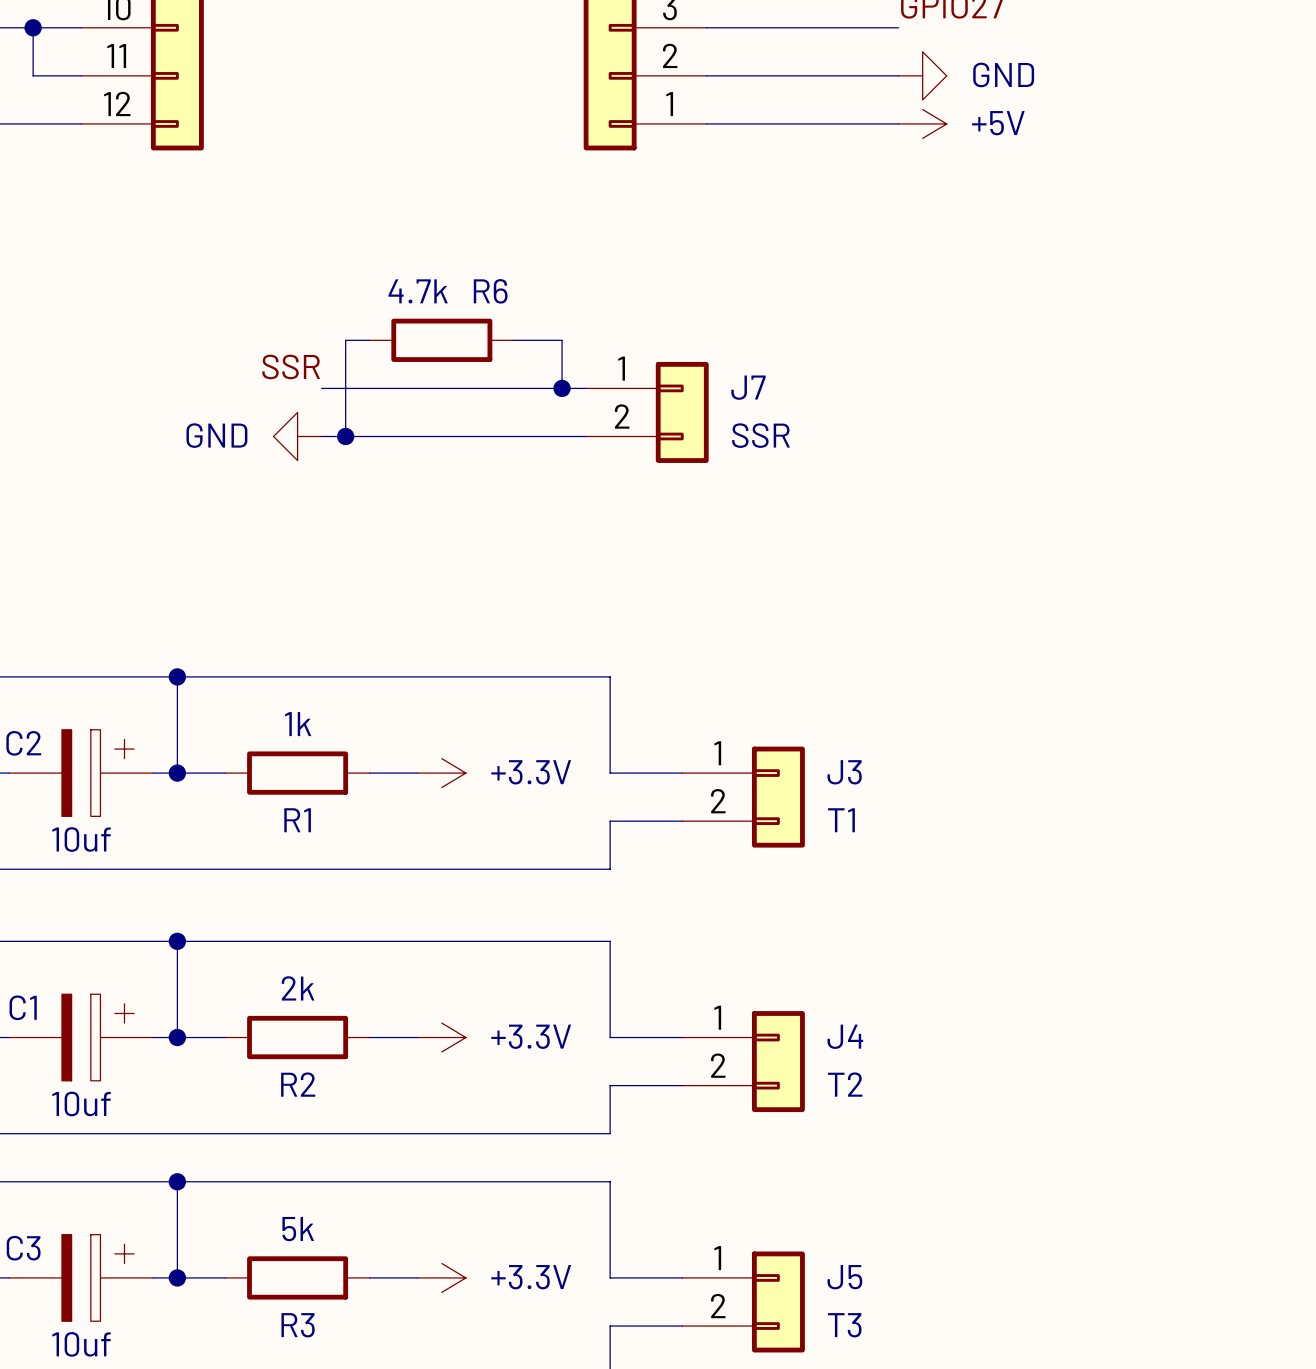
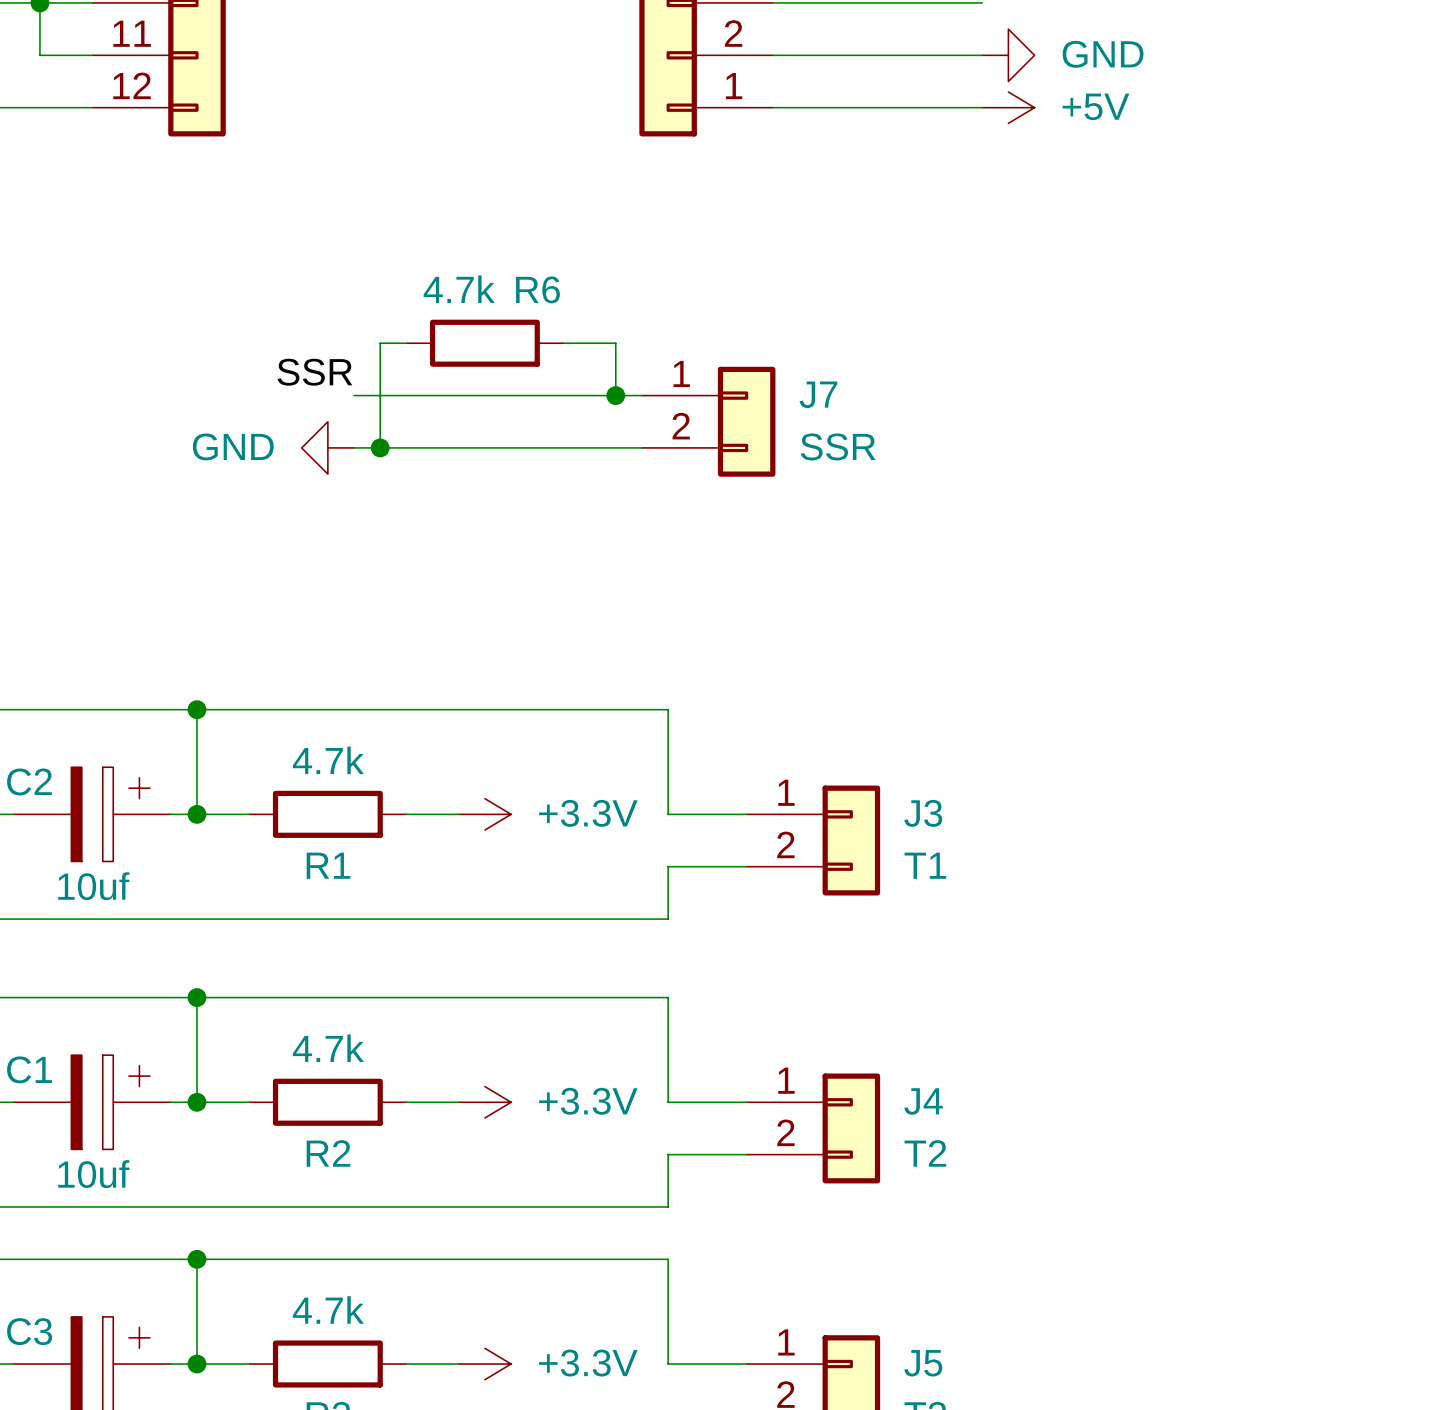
R1 value: 1k (298, 724) -> 4.7k (328, 760)
R2 value: 2k (298, 988) -> 4.7k (328, 1048)
R3 value: 5k (298, 1229) -> 4.7k (328, 1309)

